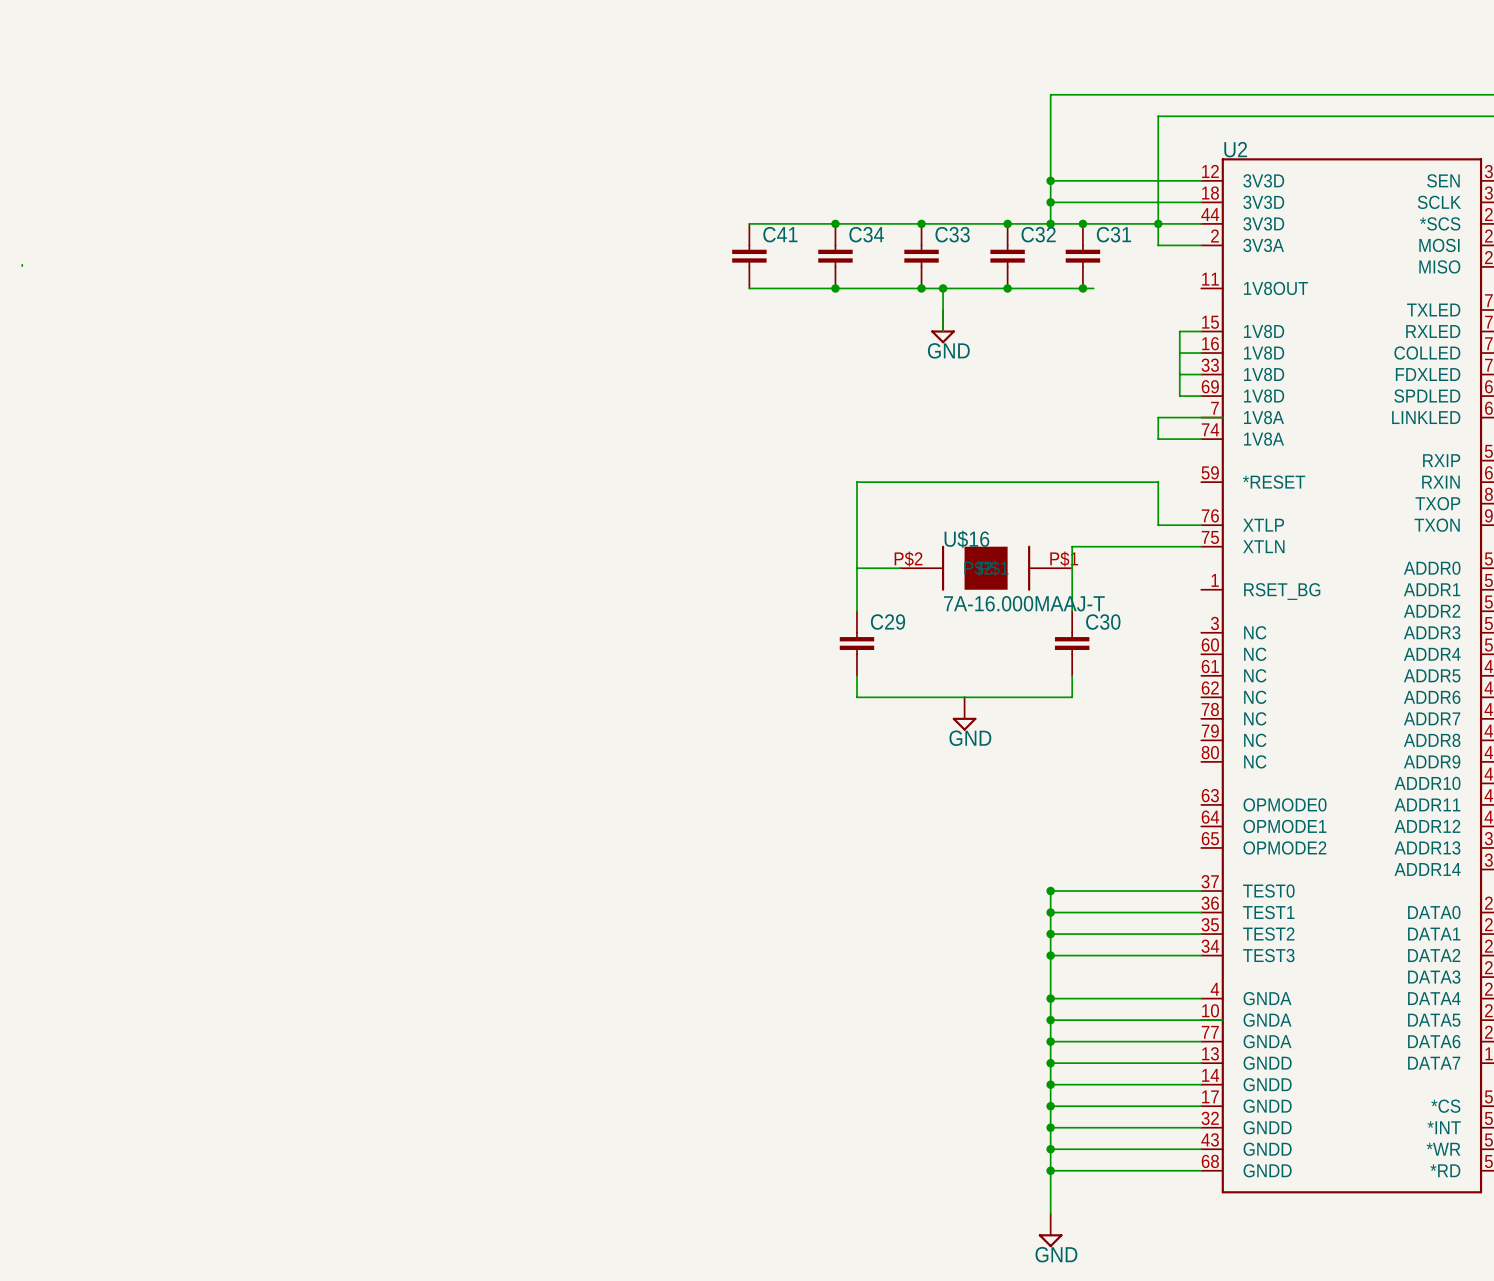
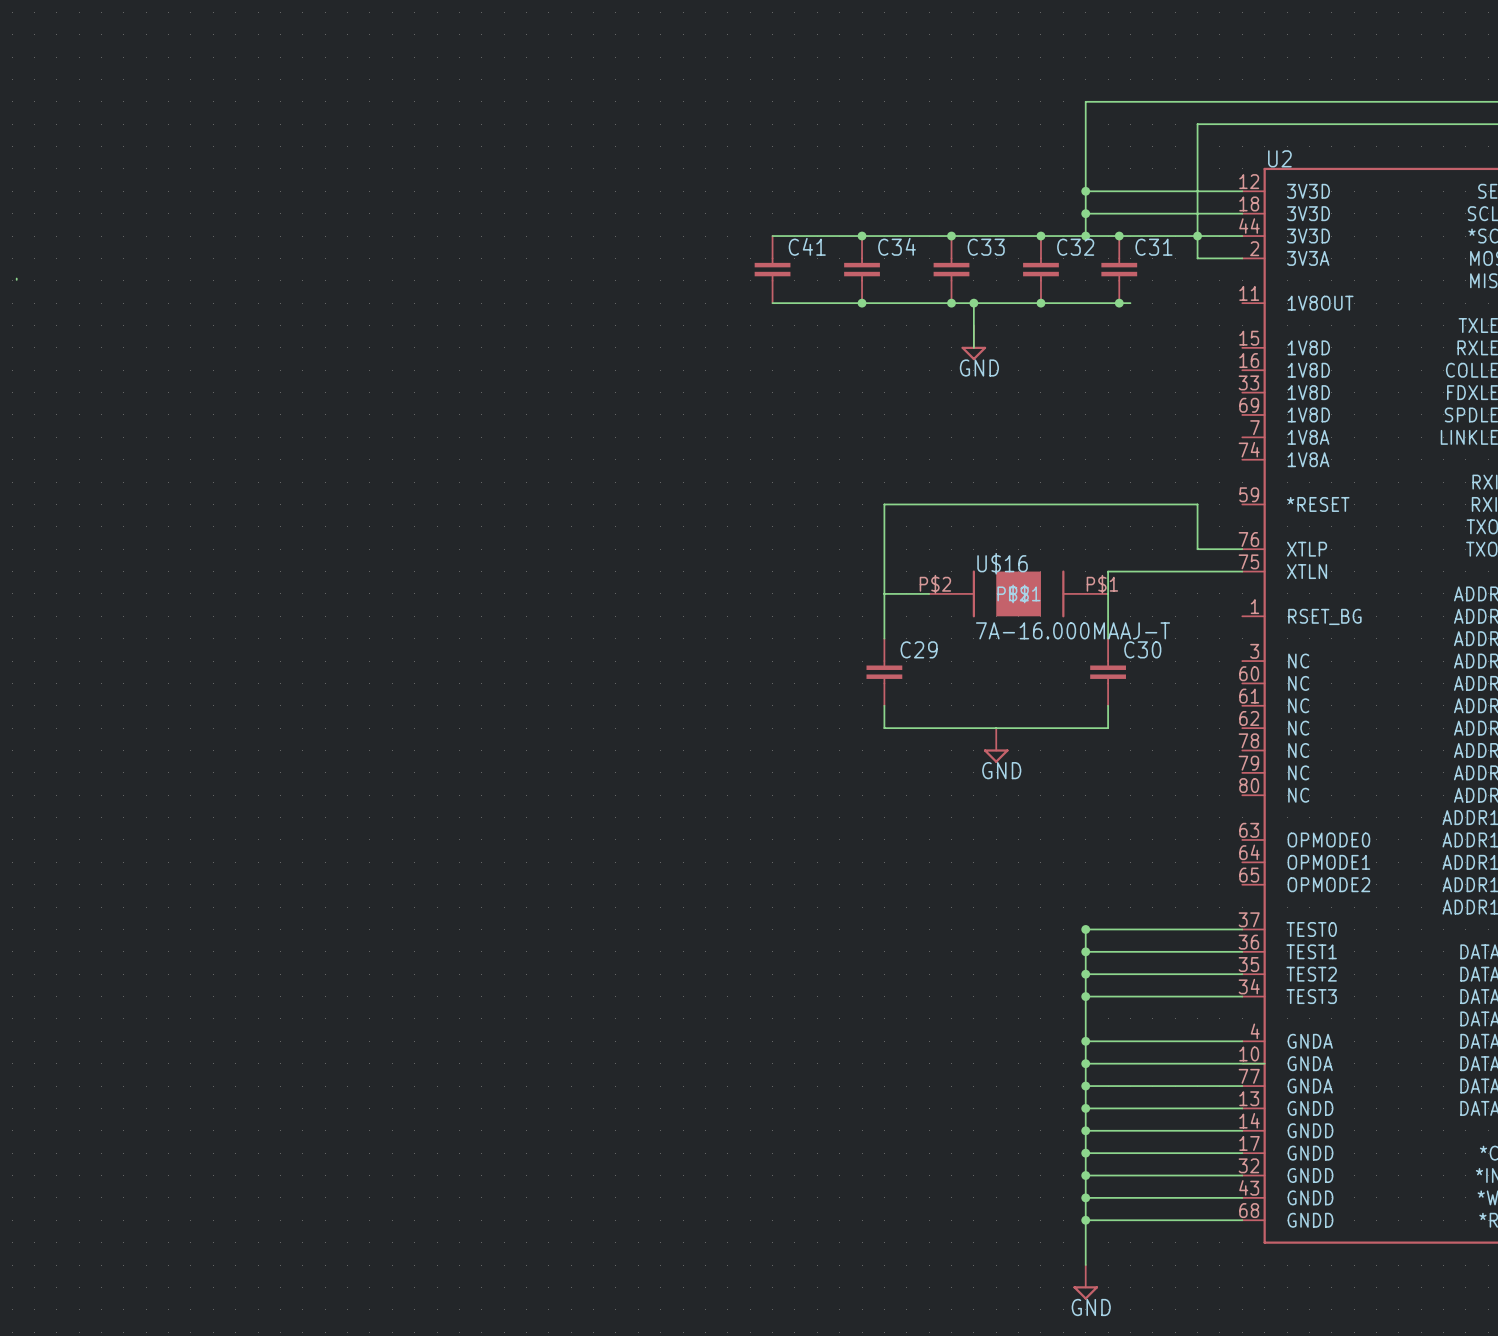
wire: (1201, 331) (1179, 331) (1179, 396) (1201, 396) -> none
wire: (1179, 353) (1201, 353) -> none
wire: (1179, 374) (1201, 374) -> none
wire: (1222, 417) (1158, 417) (1158, 439) (1201, 439) -> none

